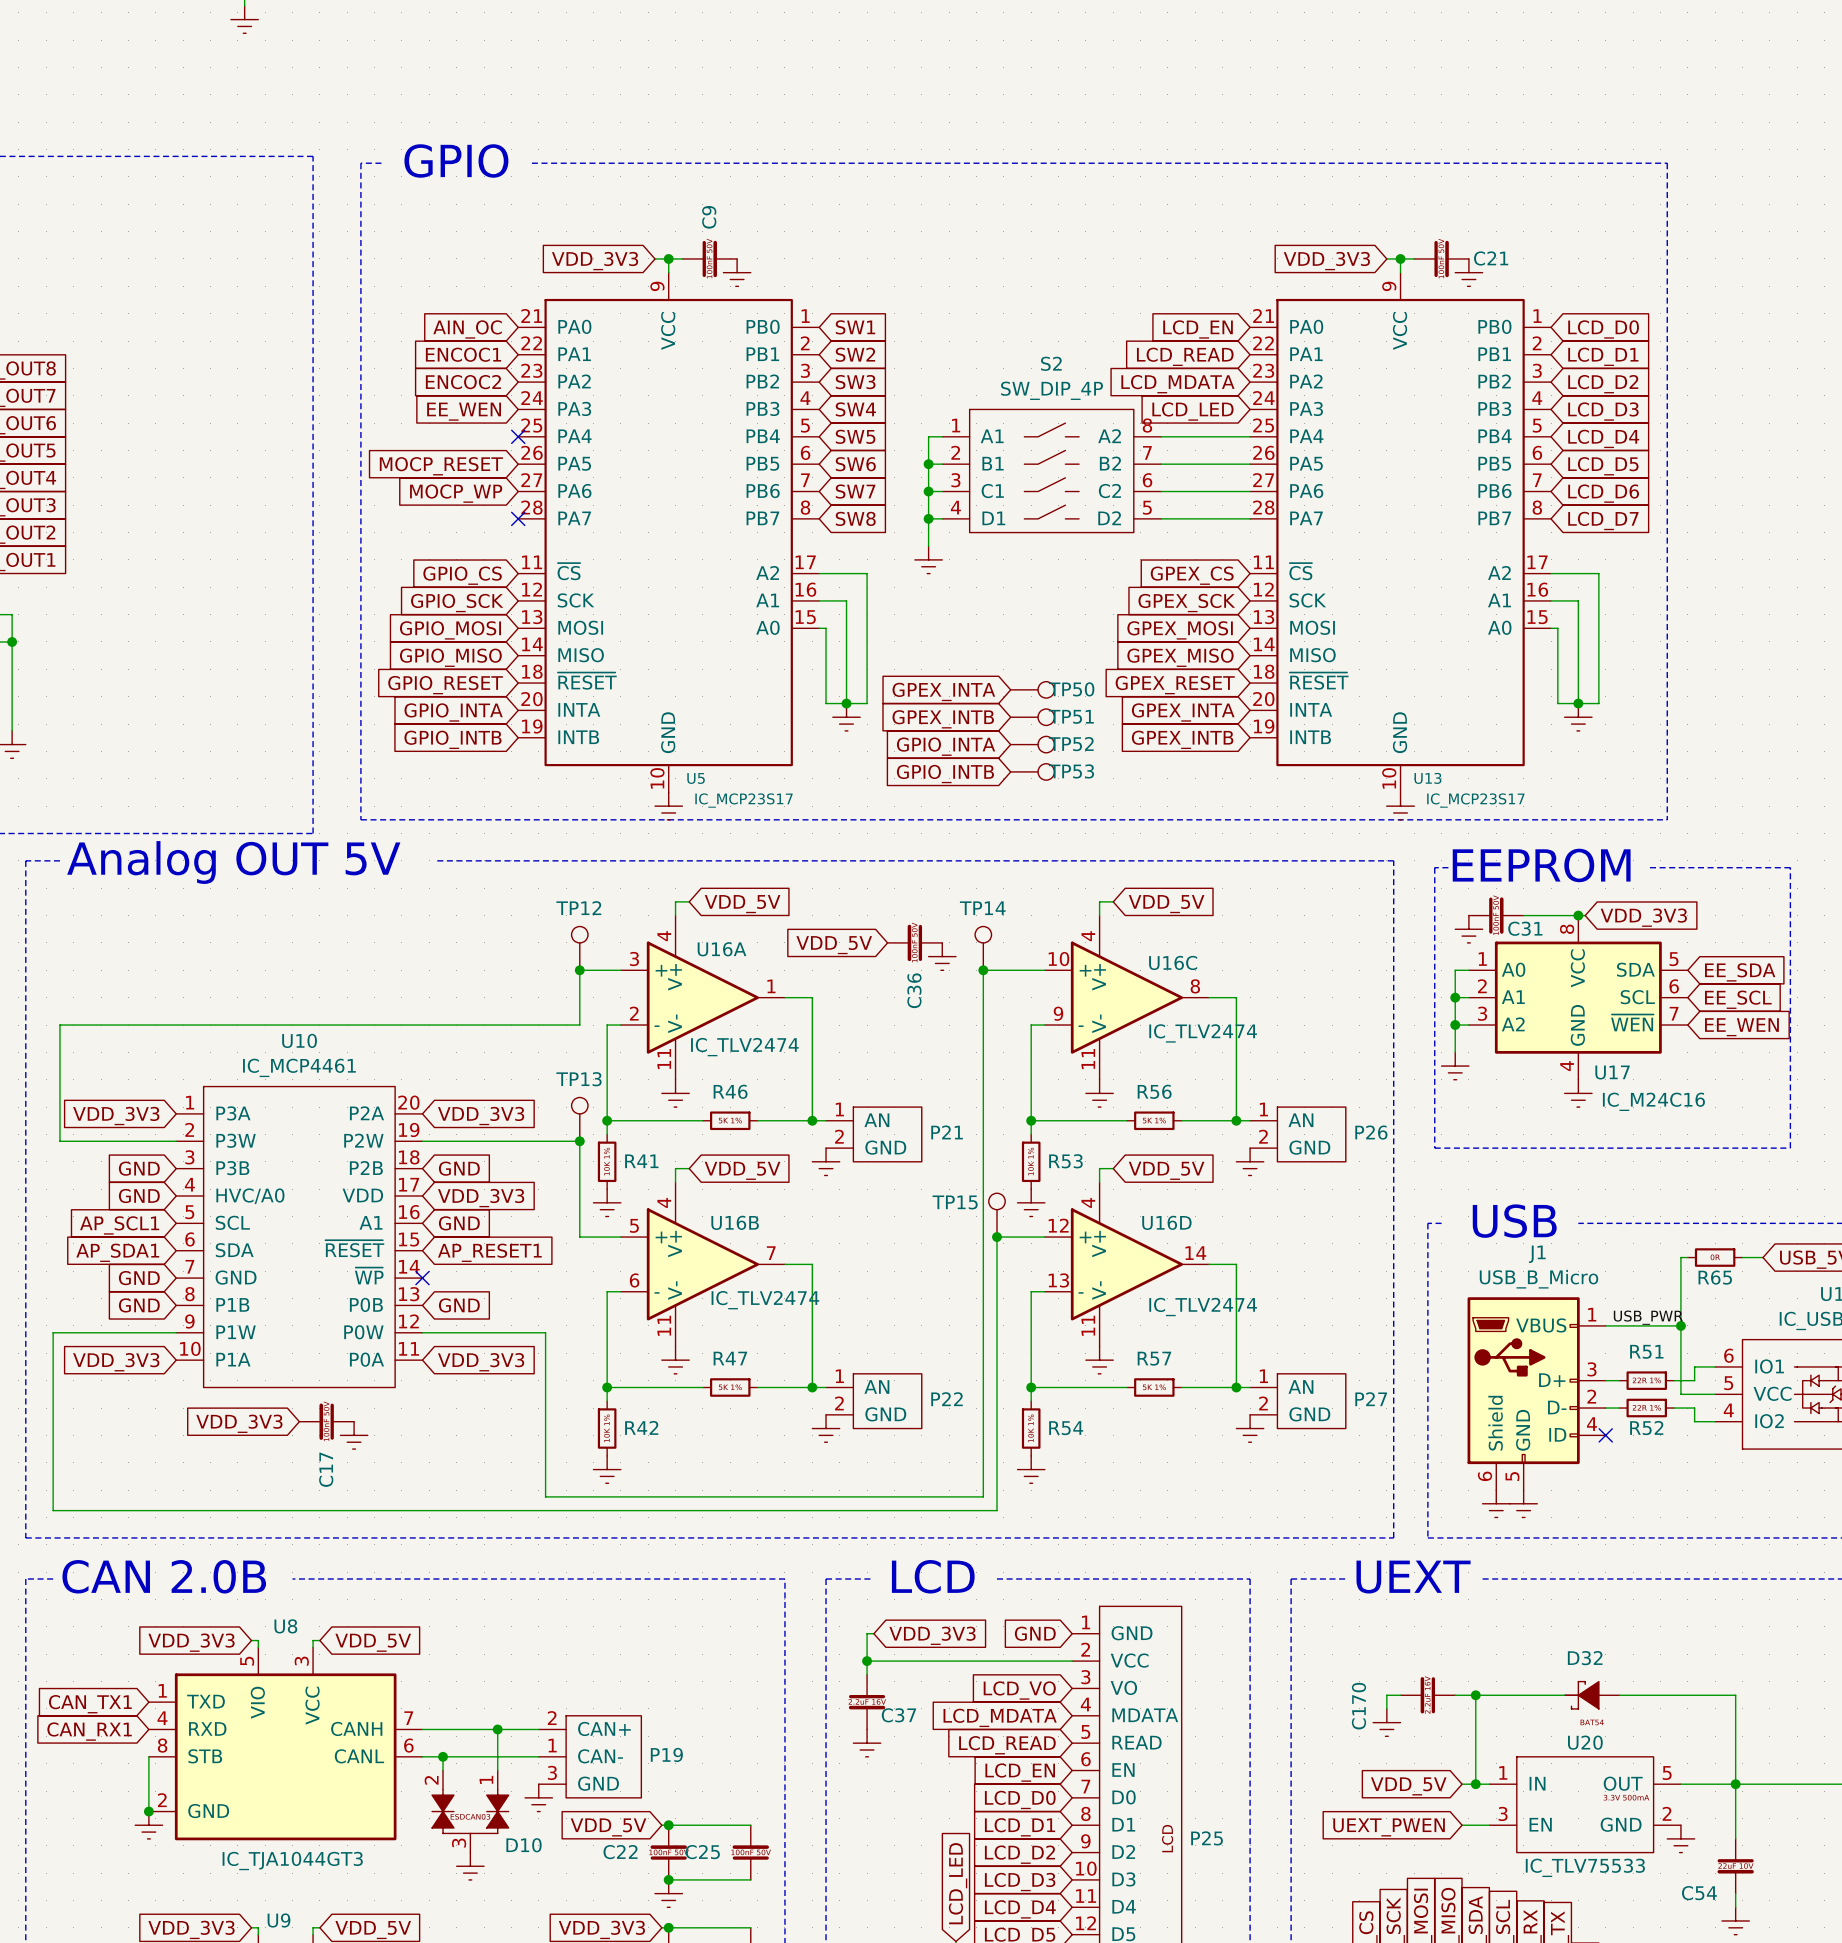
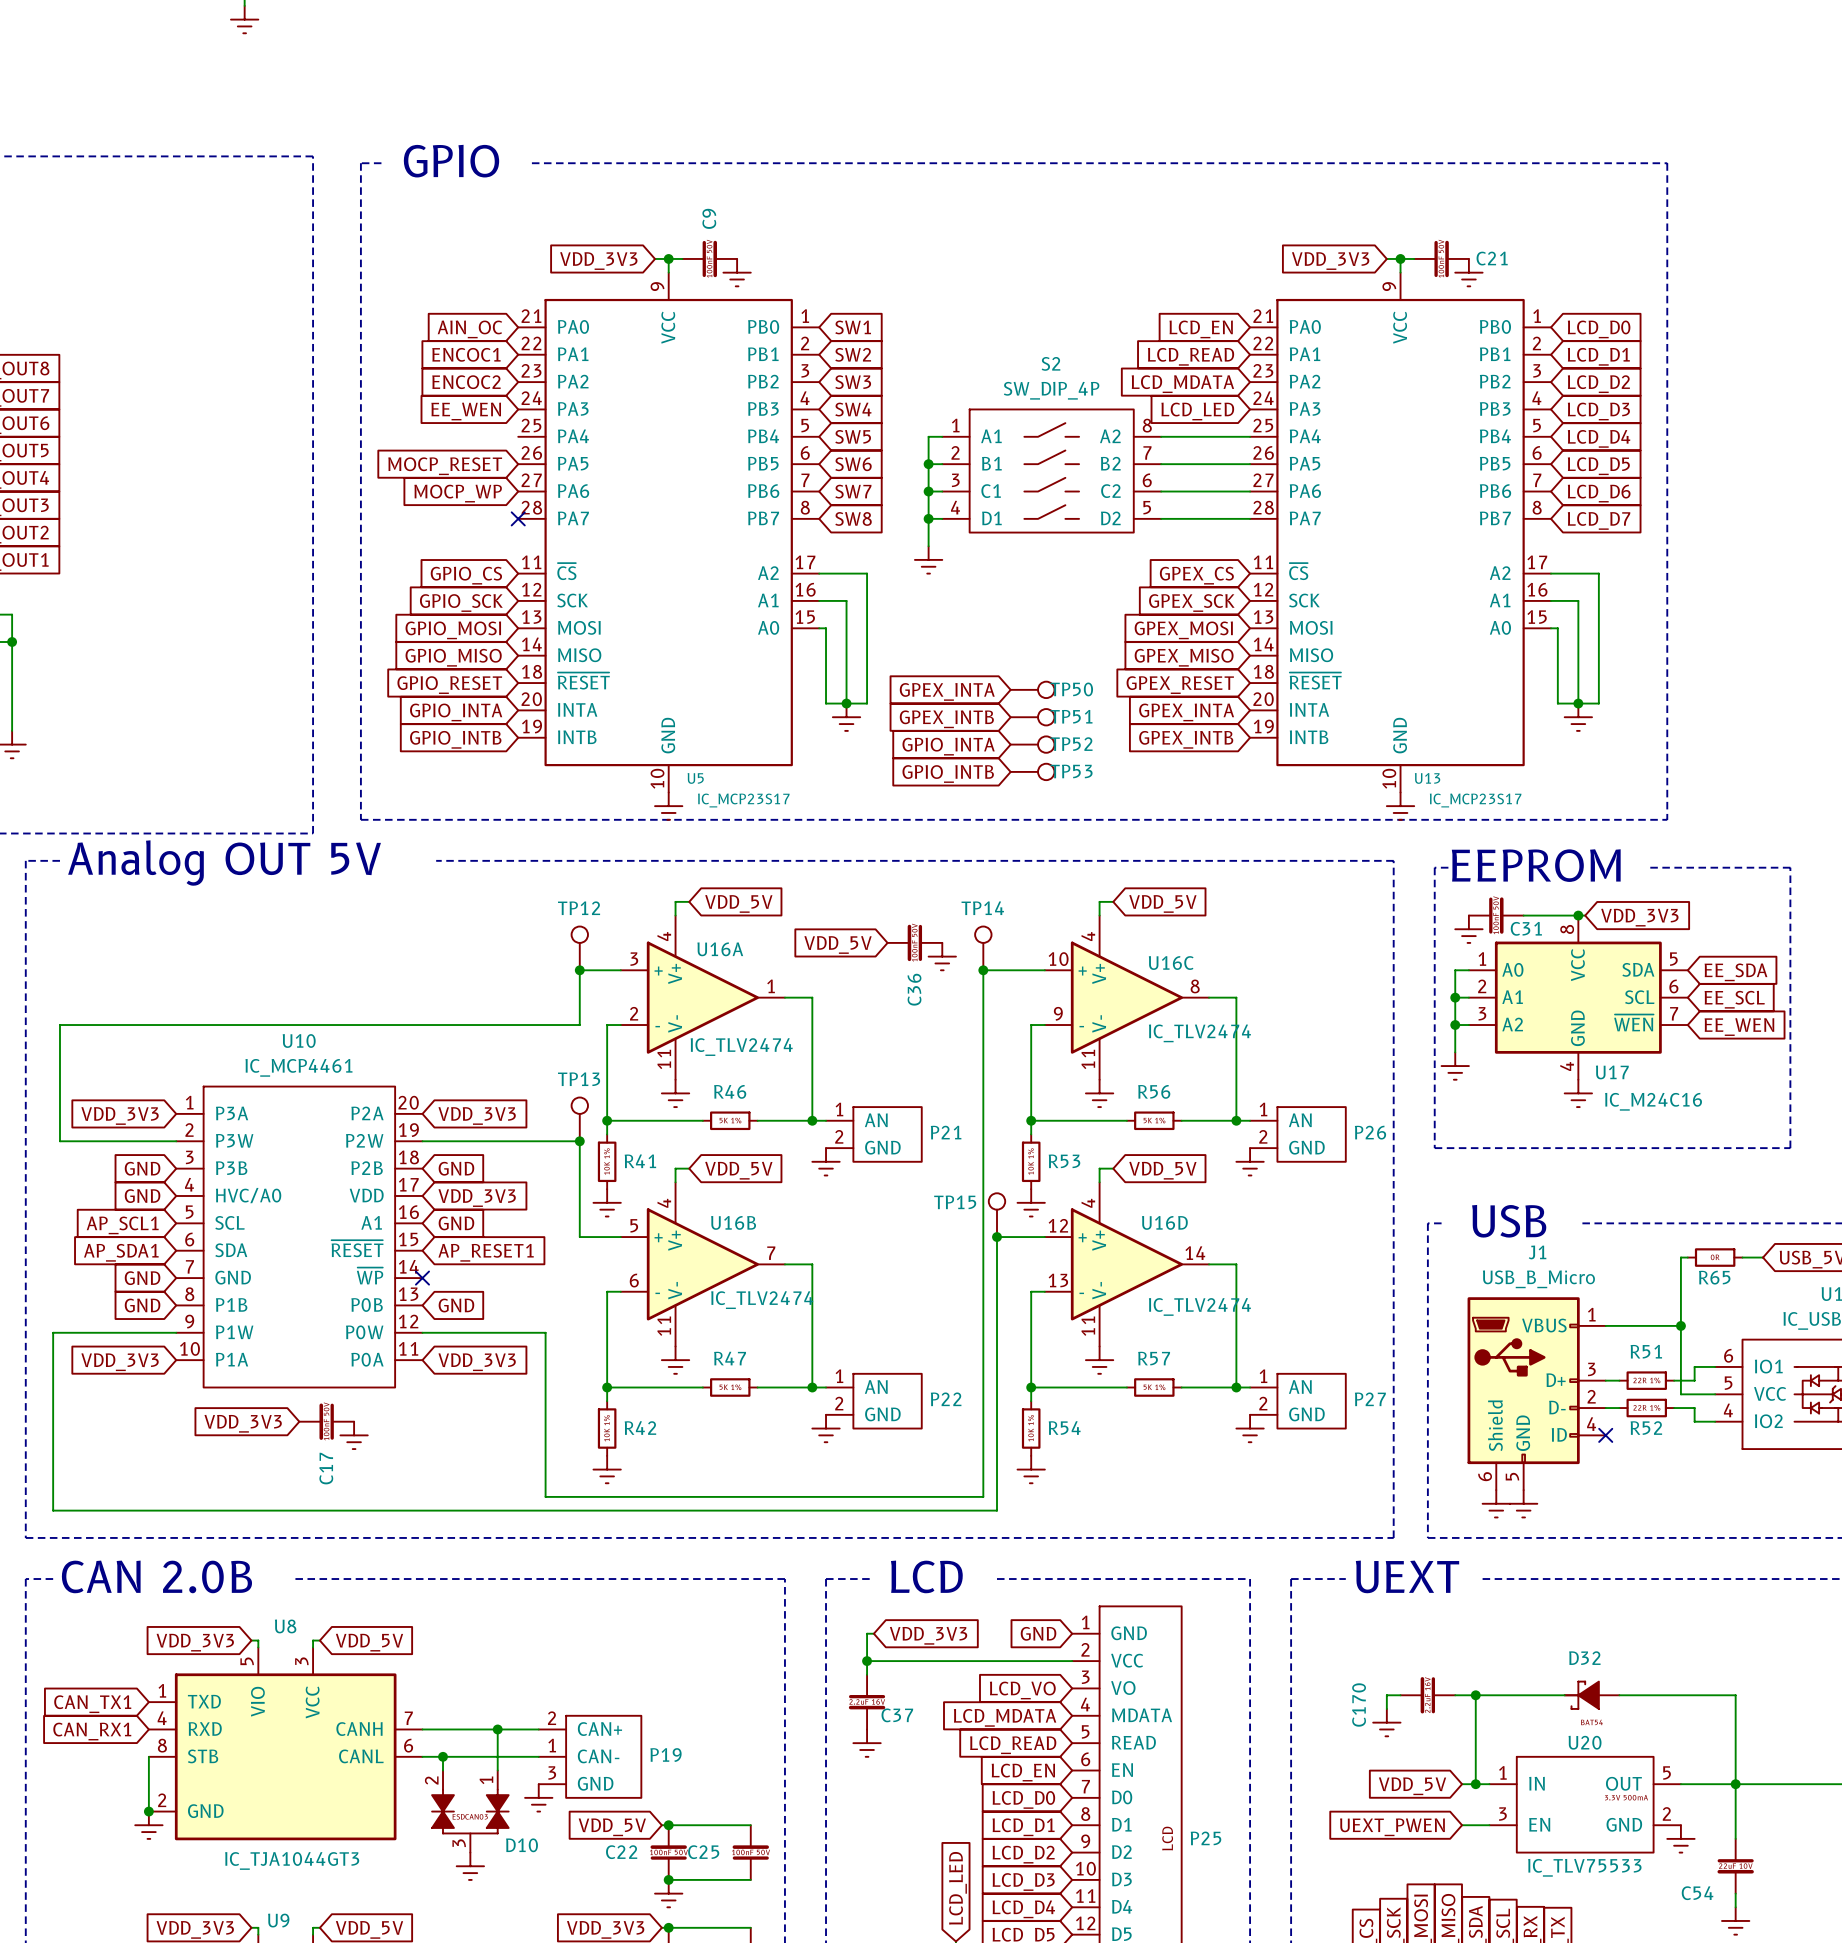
no-connect mark: (518, 436) -> none
label: USB_PWR (1648, 1317) -> none

